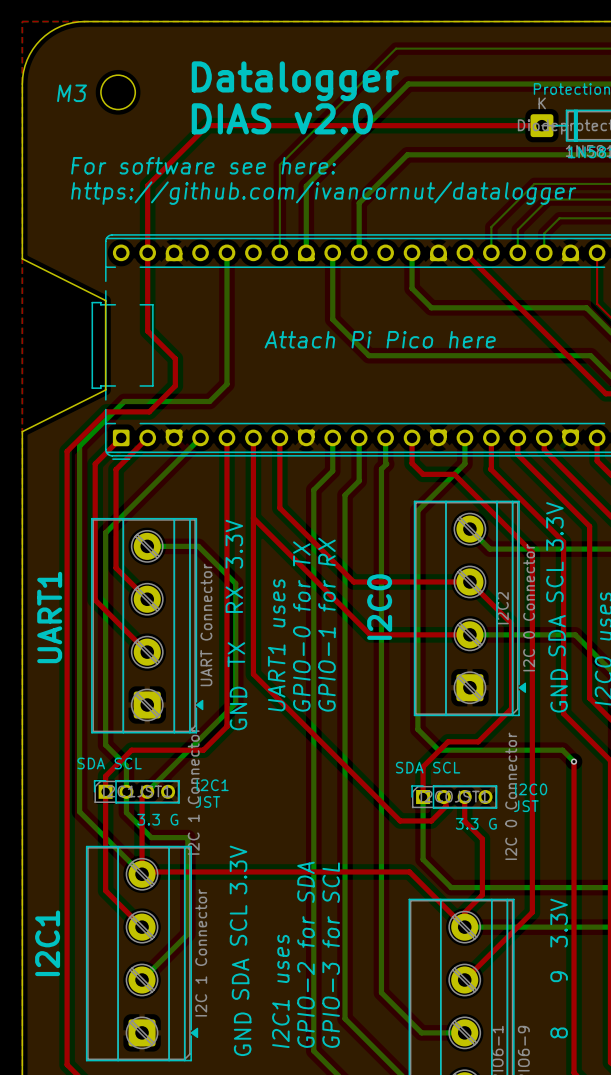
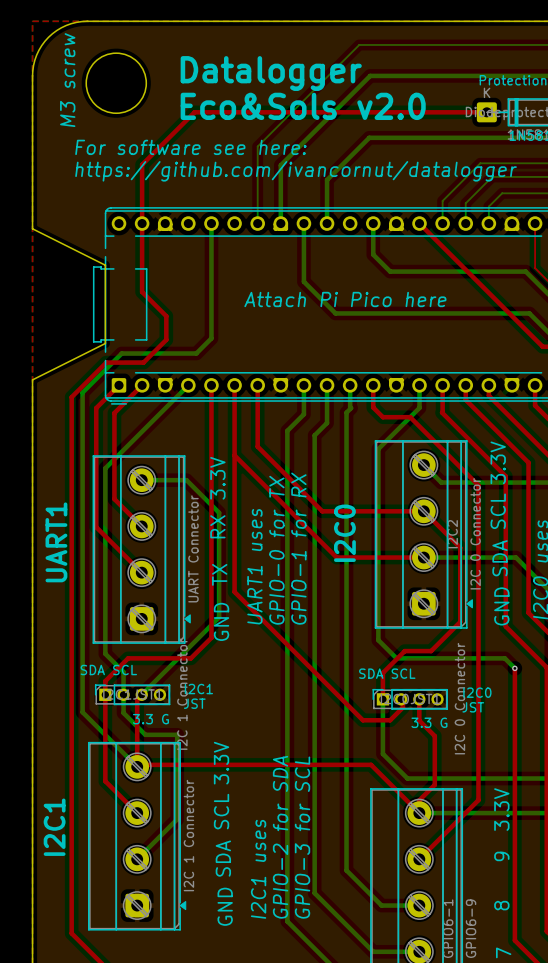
round board edge size: [100, 74, 136, 110] -> [86, 52, 147, 114]
text: none -> M3 screw (67, 80)
text: M3 (72, 93) -> none
text: DIAS v2.0 (282, 118) -> Eco&Sols v2.0 (303, 106)

